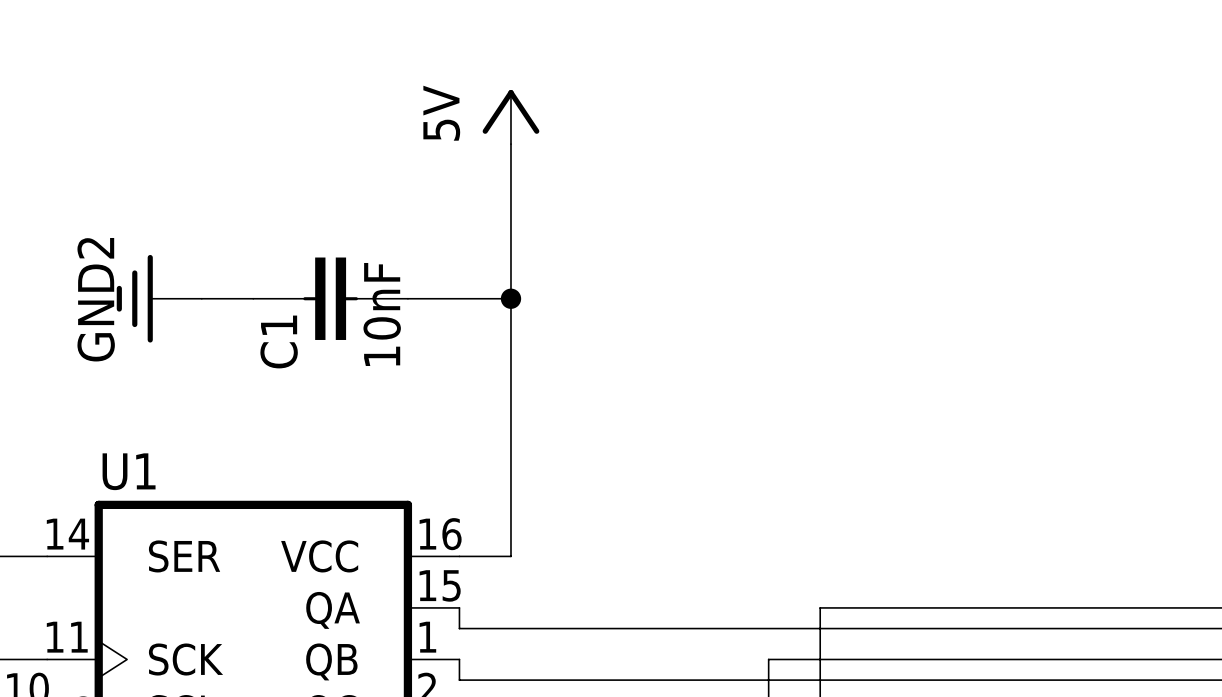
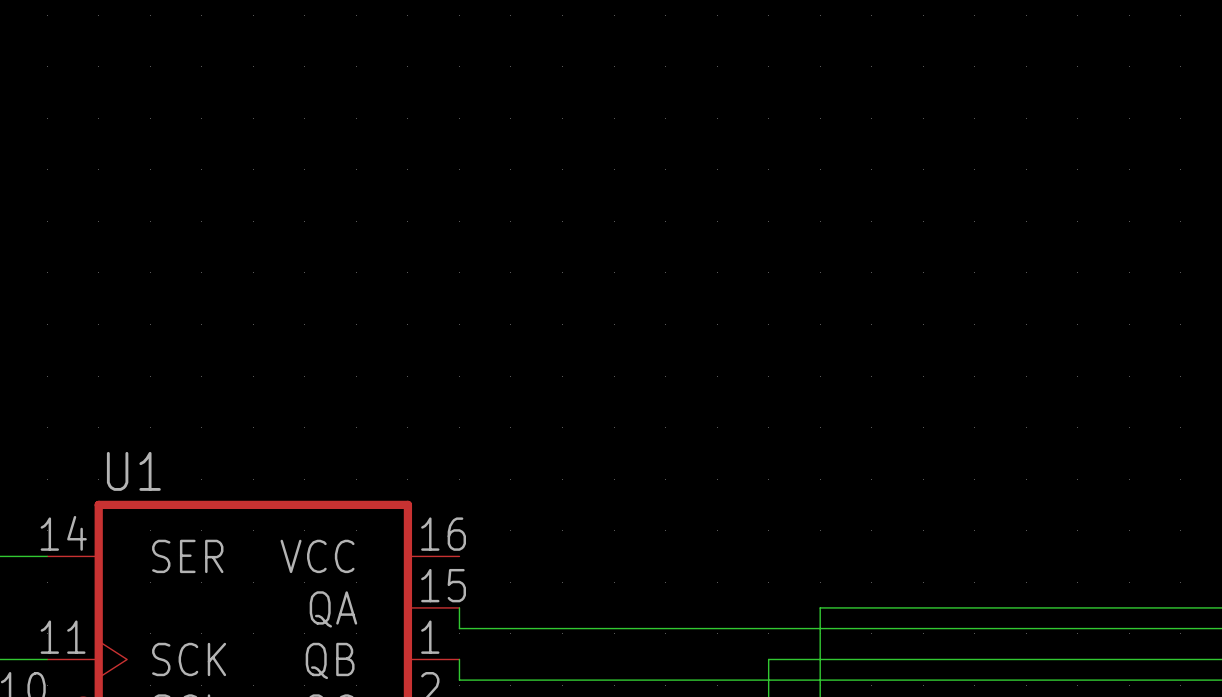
power symbol: 5V (510, 117) -> none
wire: (510, 144) (510, 556) (459, 556) -> none
power symbol: GND2 (159, 298) -> none
wire: (201, 298) (253, 298) -> none
C1: 10nF (330, 298) -> none
wire: (407, 298) (510, 298) -> none
junction: (510, 298) -> none

